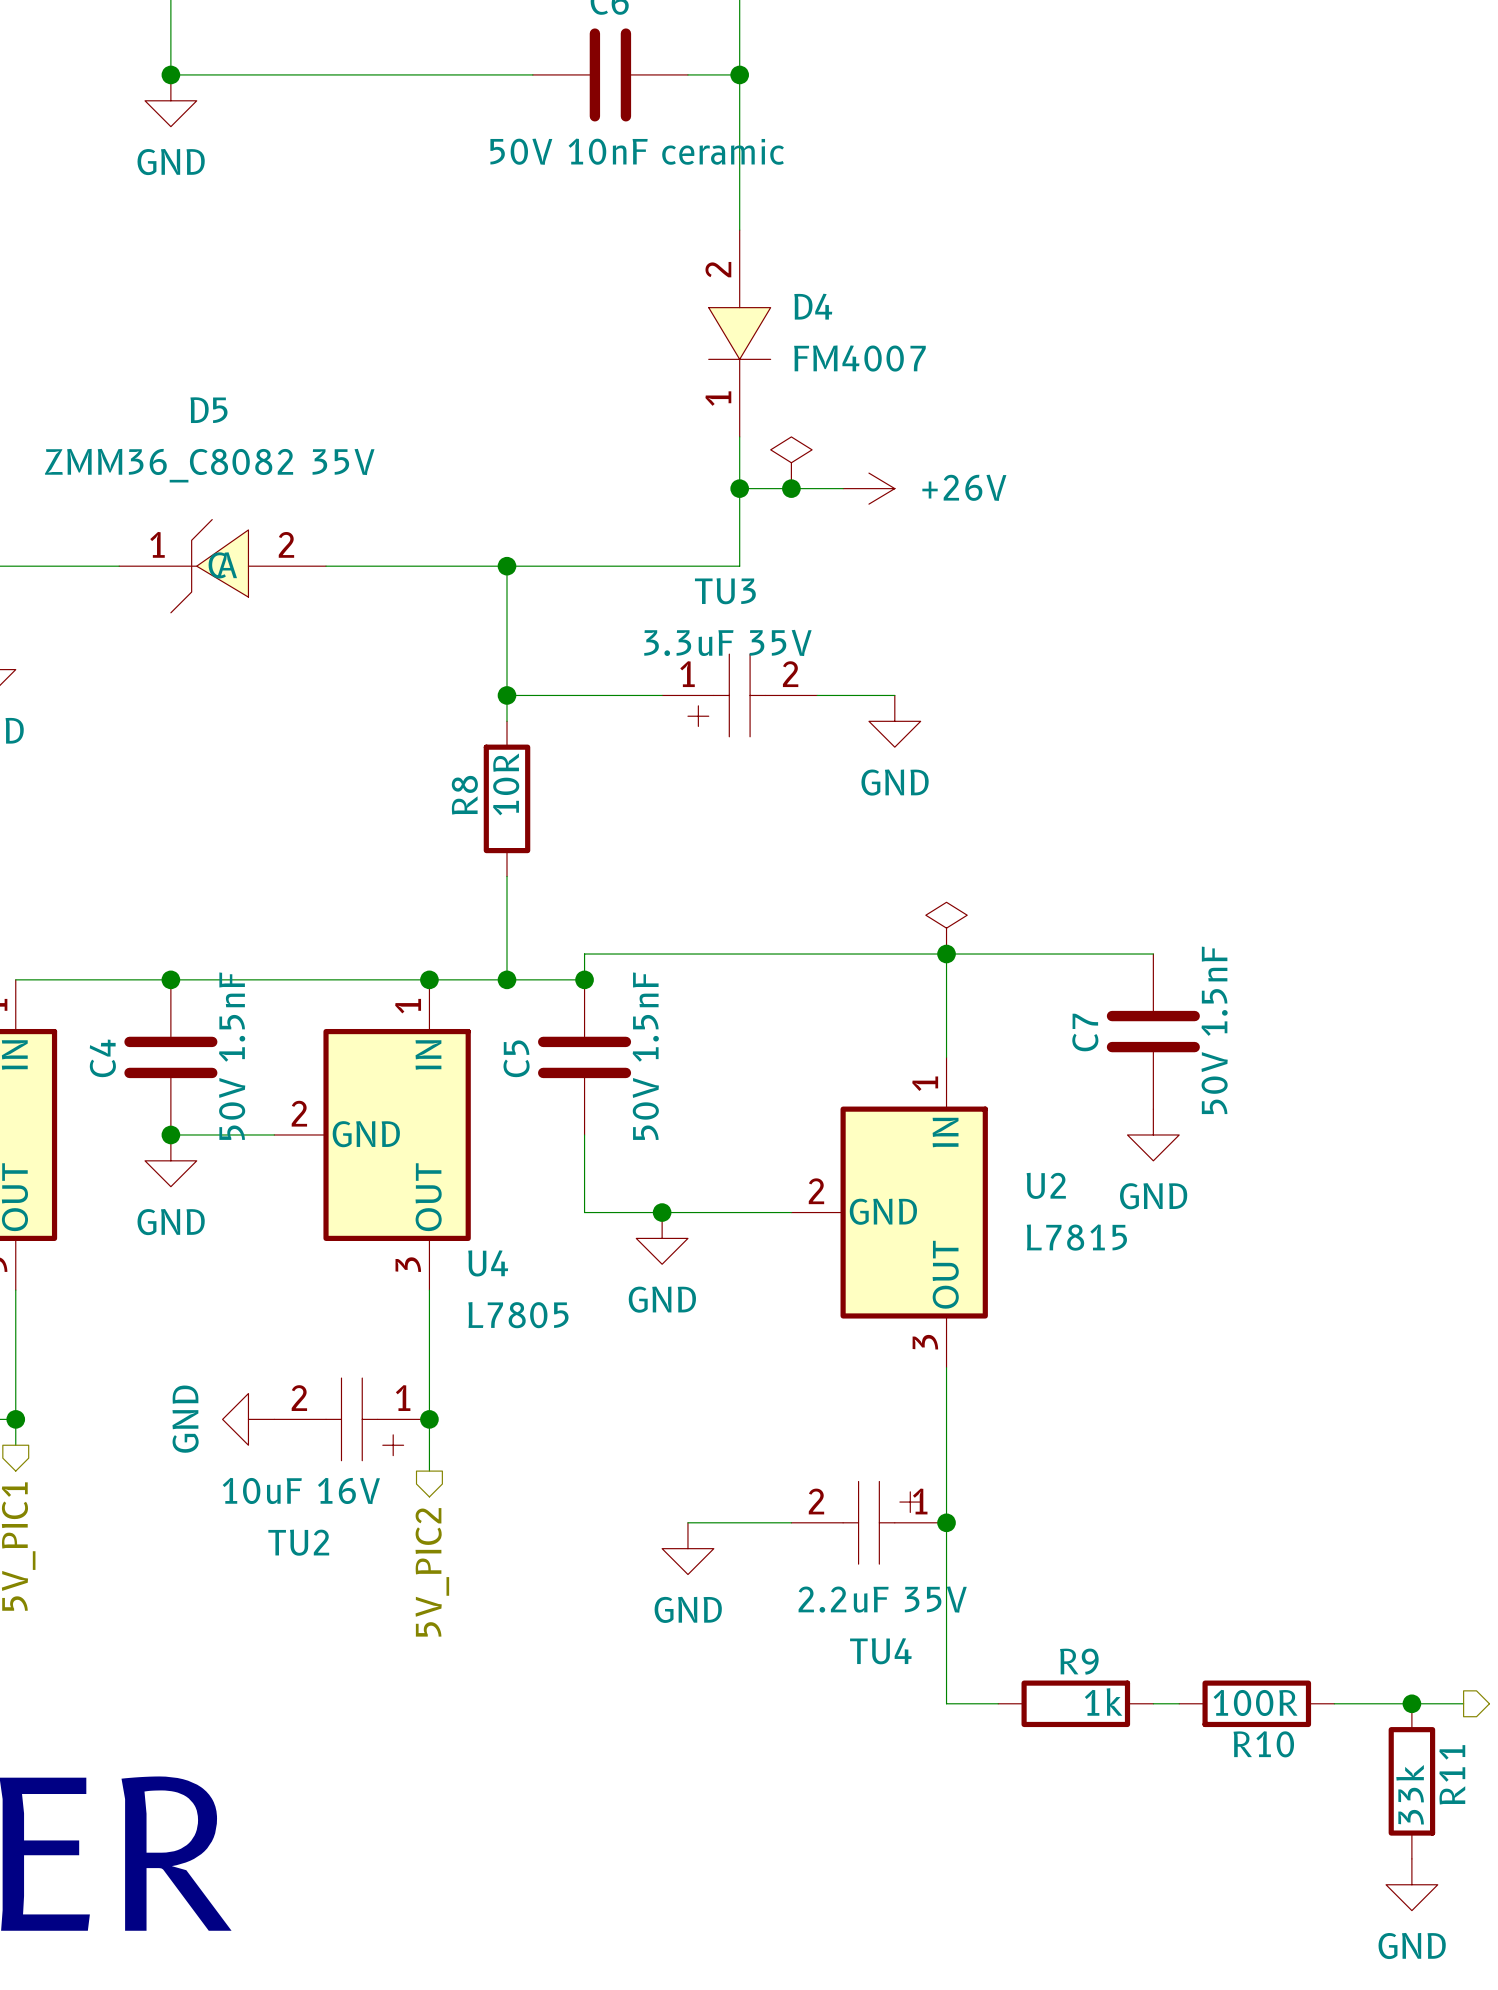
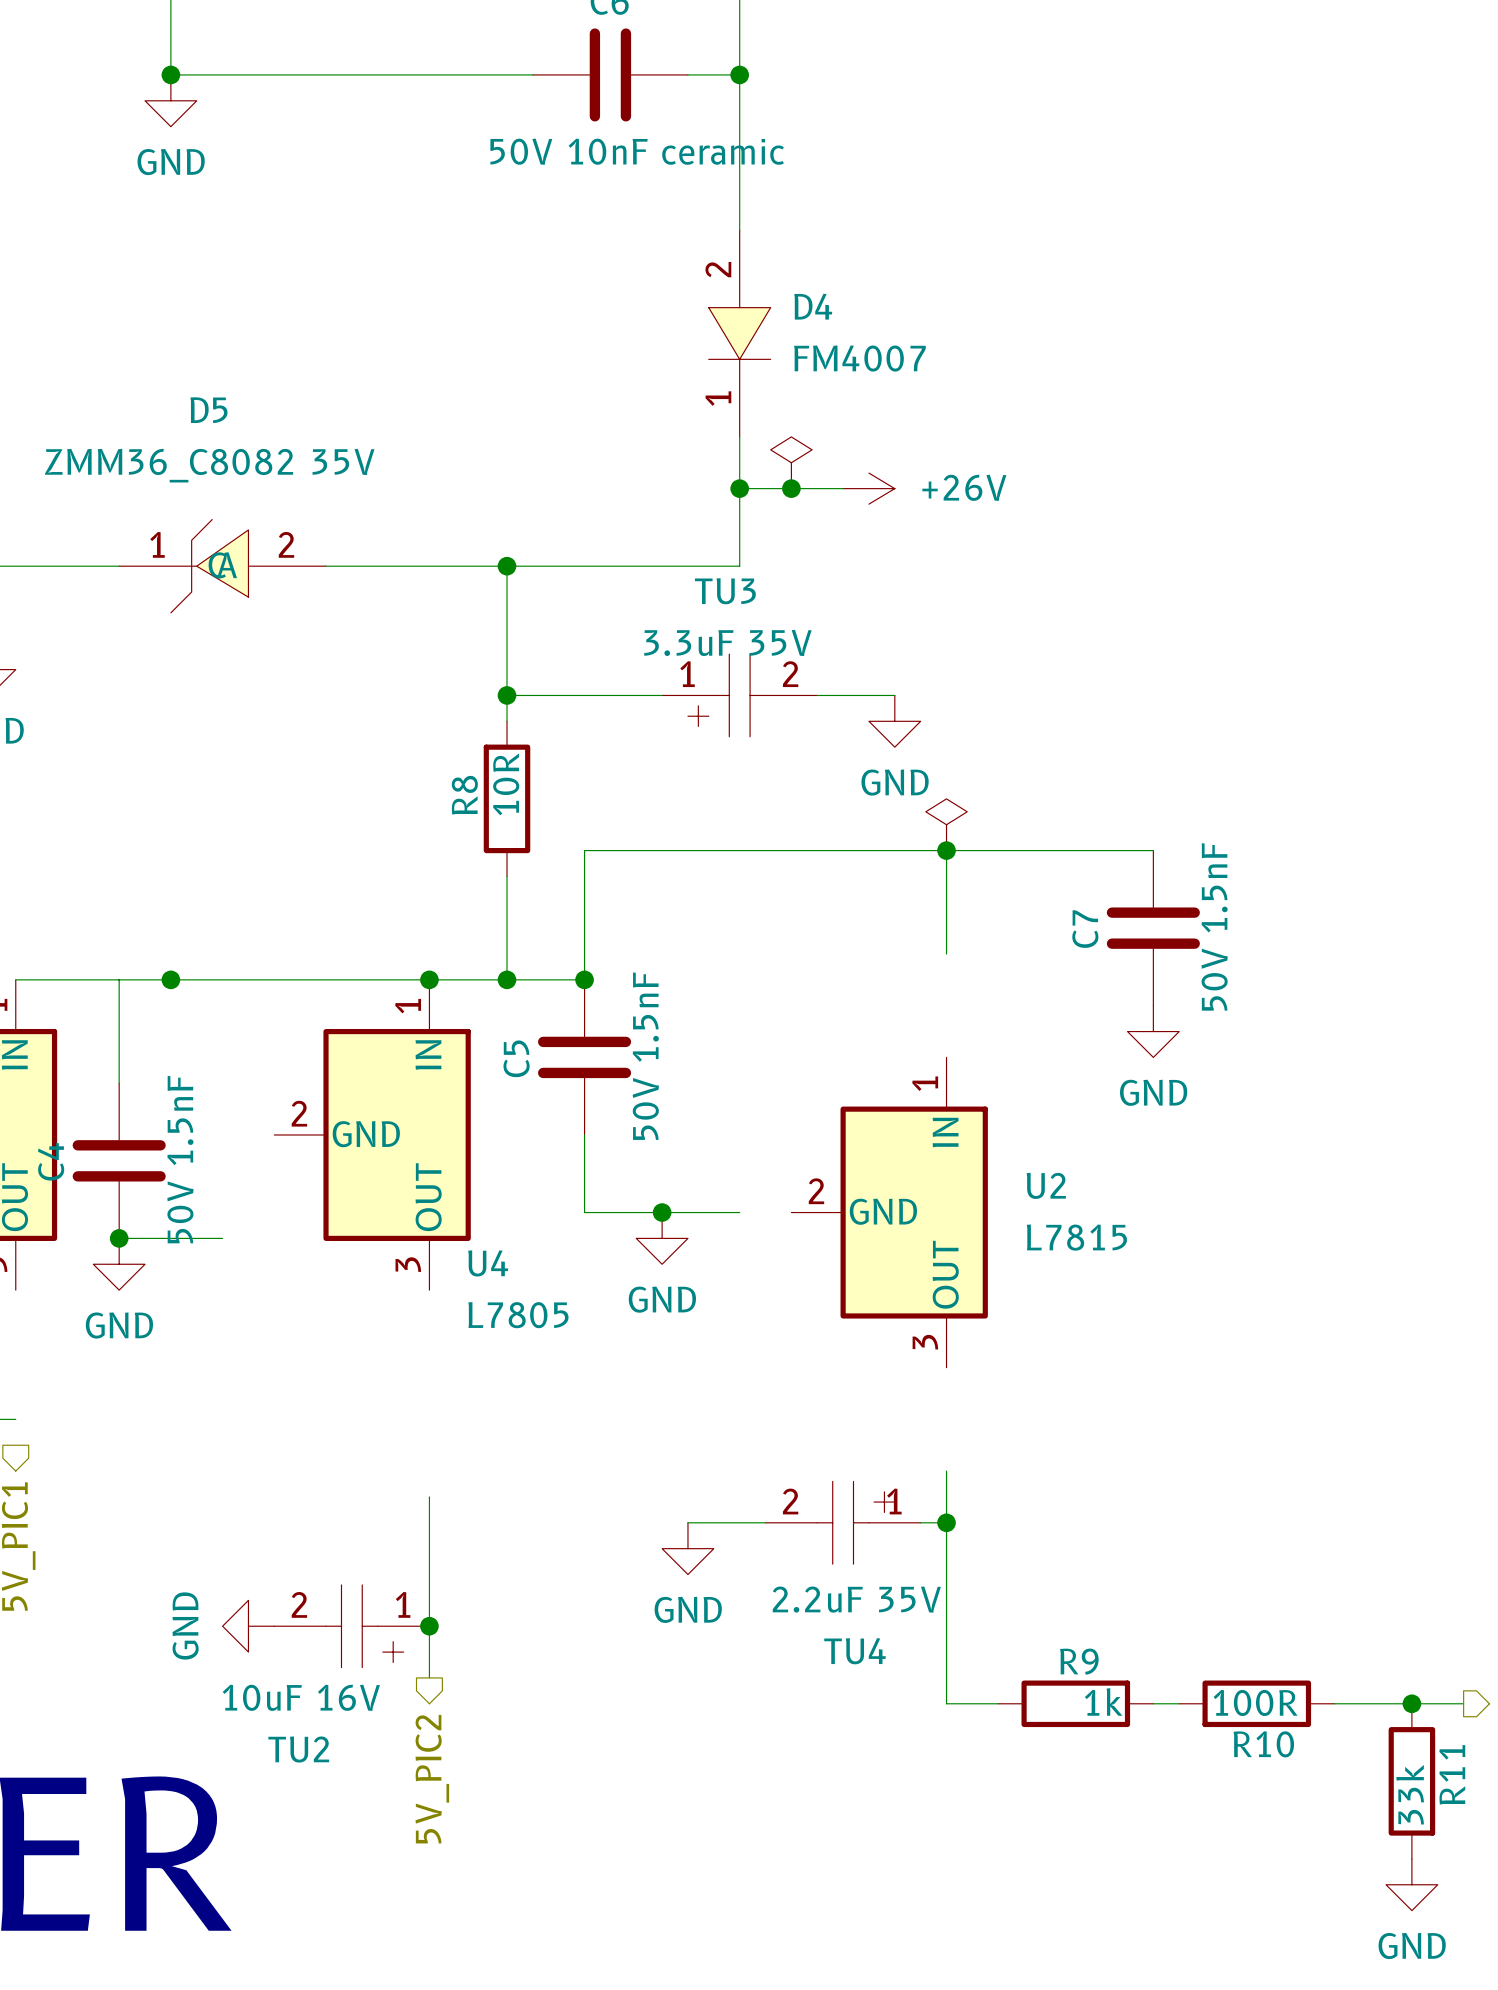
power symbol position: (946, 928) -> (946, 824)
wire: (584, 954) (1153, 954) -> (584, 954) (584, 850) (1153, 850)
wire: (946, 954) (946, 1057) -> (946, 954) (946, 850)
junction position: (946, 954) -> (946, 850)
wire: none -> (119, 979) (119, 1083)
C7 position: (1153, 1031) -> (1153, 928)
C4 position: (170, 1057) -> (119, 1160)
wire: (170, 1134) (274, 1134) -> (119, 1238) (222, 1238)
junction: (170, 1134) -> none
power symbol position: GND (1153, 1134) -> GND (1153, 1031)
power symbol: GND (170, 1160) -> none
wire: (739, 1212) (791, 1212) -> none
junction: none -> (119, 1238)
power symbol: none -> GND (119, 1264)
wire: (15, 1290) (15, 1445) -> none
wire: (429, 1290) (429, 1471) -> (429, 1496) (429, 1677)
wire: (946, 1367) (946, 1471) -> none
junction: (15, 1419) -> none
power symbol: GND (248, 1419) -> none
TU2 position: (351, 1419) -> (351, 1626)
junction: (429, 1419) -> none
TU4 position: (868, 1522) -> (843, 1522)
hierarchical label position: 5V_PIC2 (432, 1572) -> 5V_PIC2 (432, 1779)
power symbol: none -> GND (248, 1626)
junction: none -> (429, 1626)

